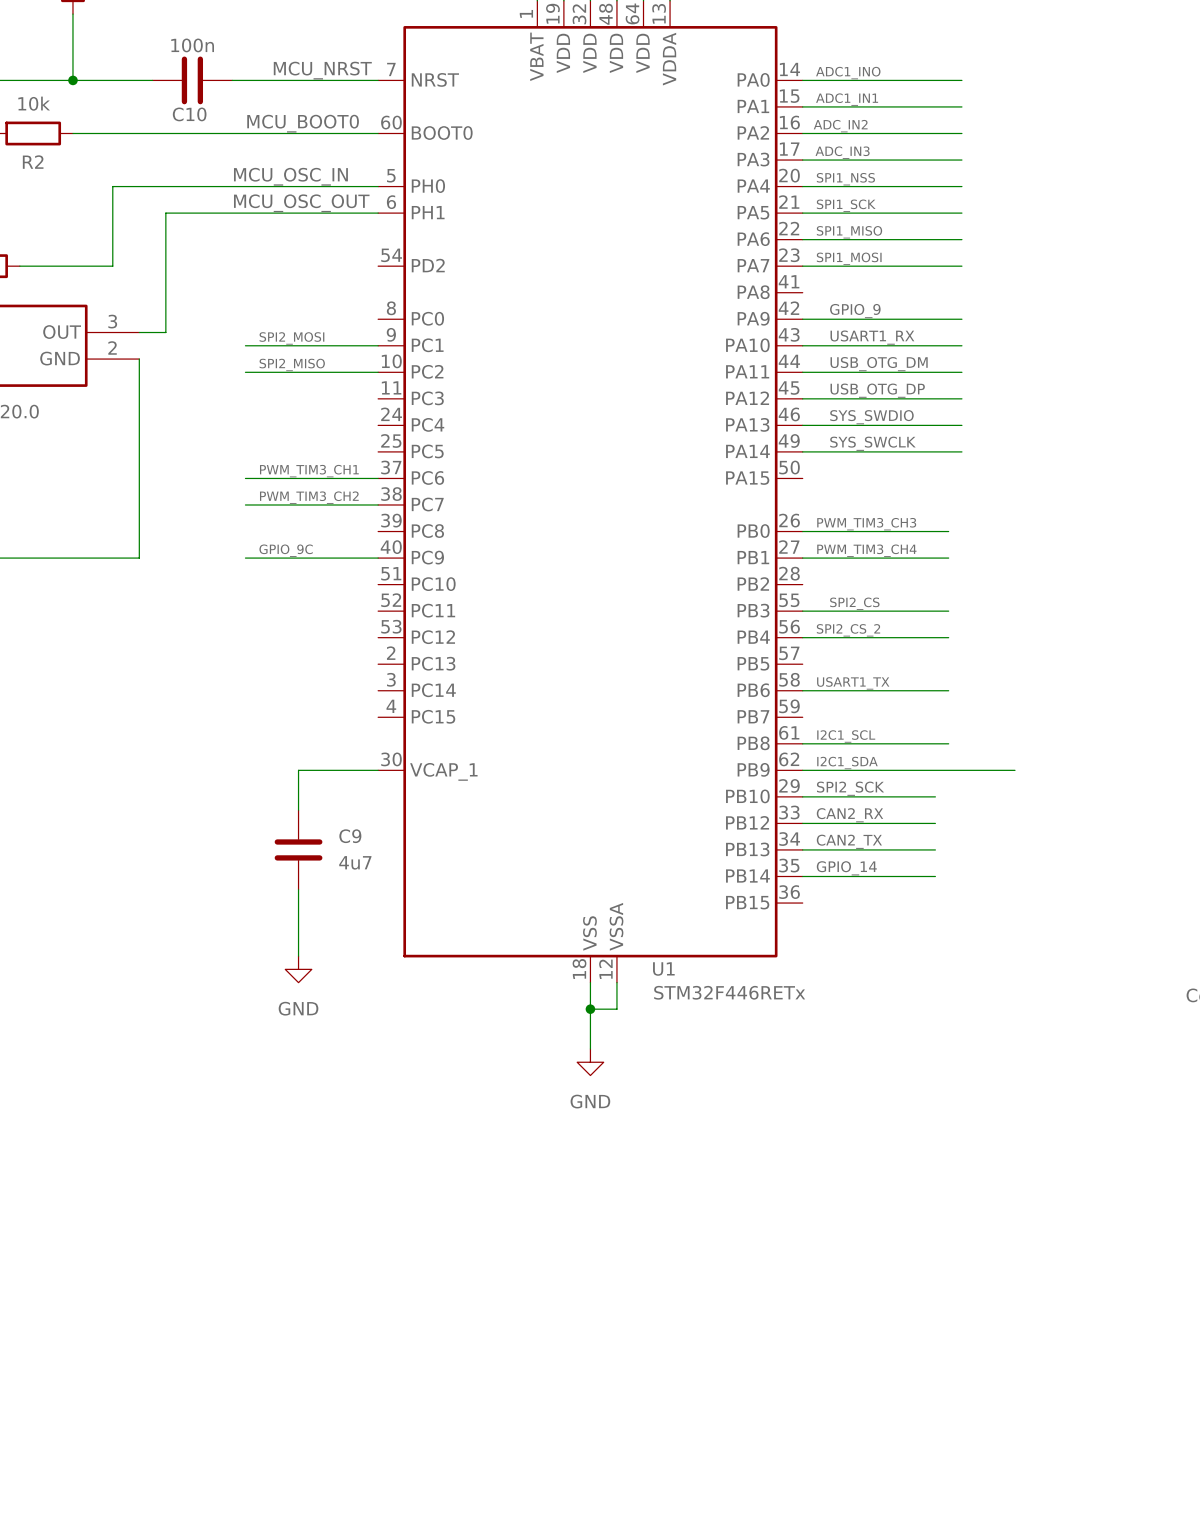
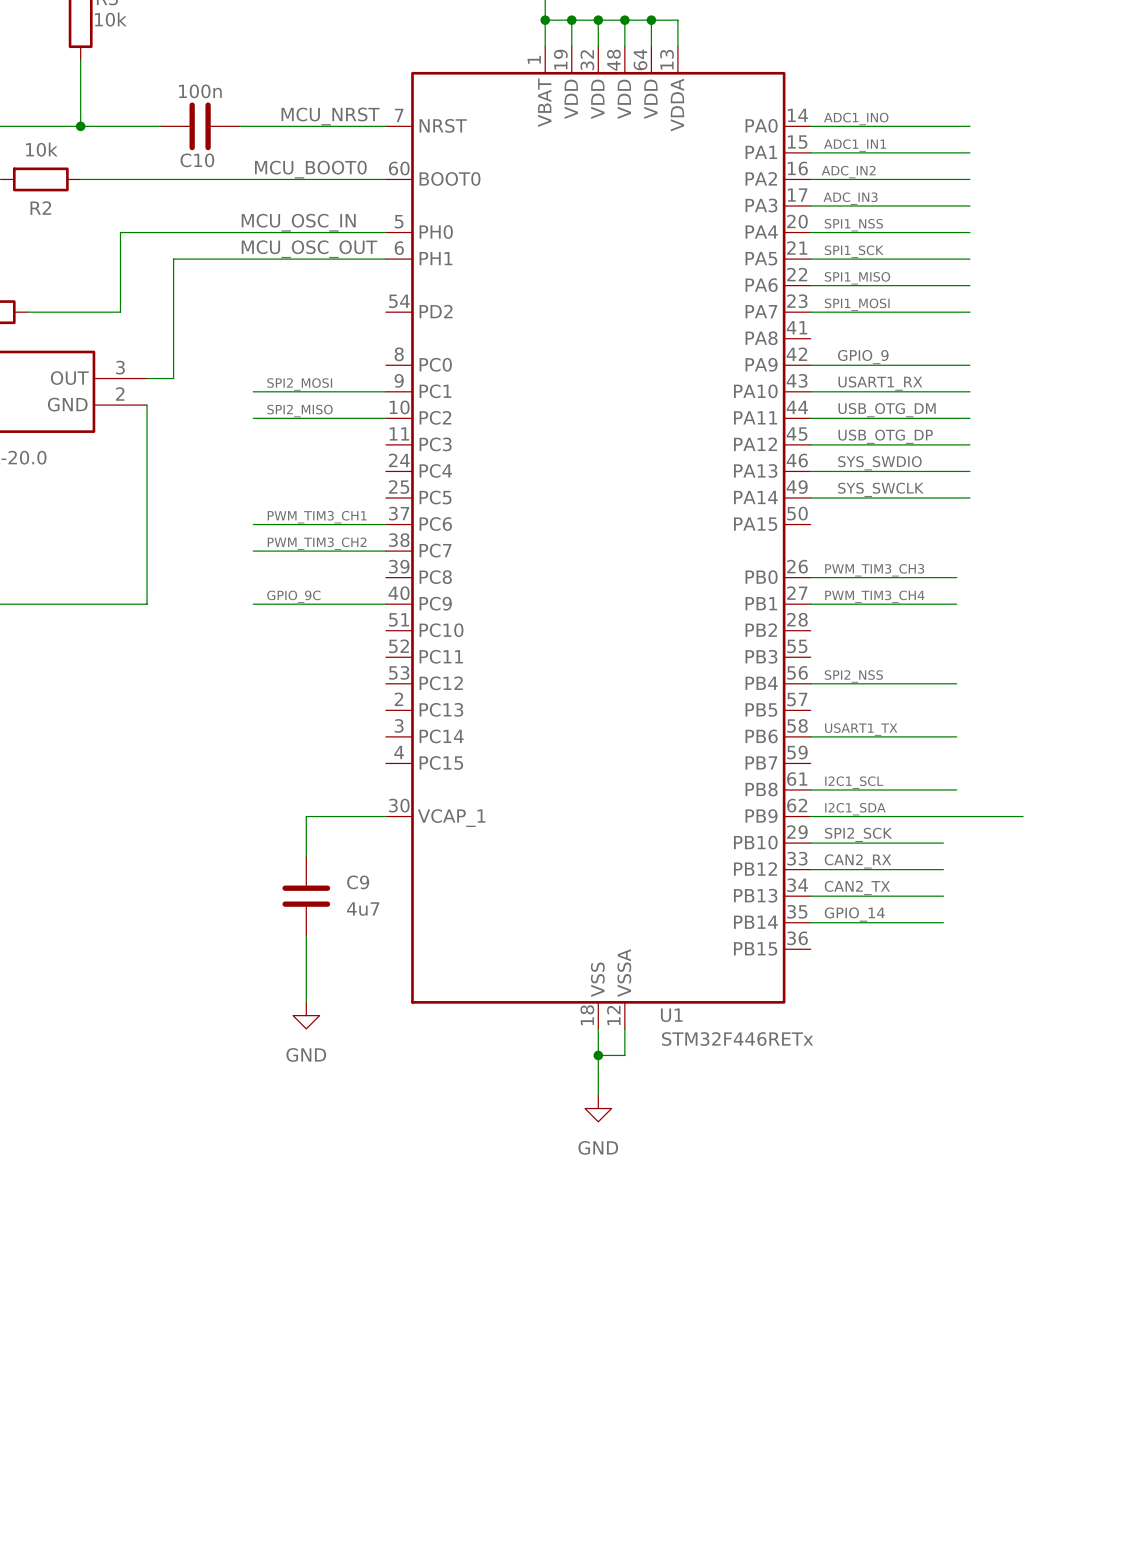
label: SPI2_CS (854, 603) -> none
wire: (802, 611) (948, 611) -> none
label: SPI2_CS_2 (848, 630) -> SPI2_NSS (853, 676)

